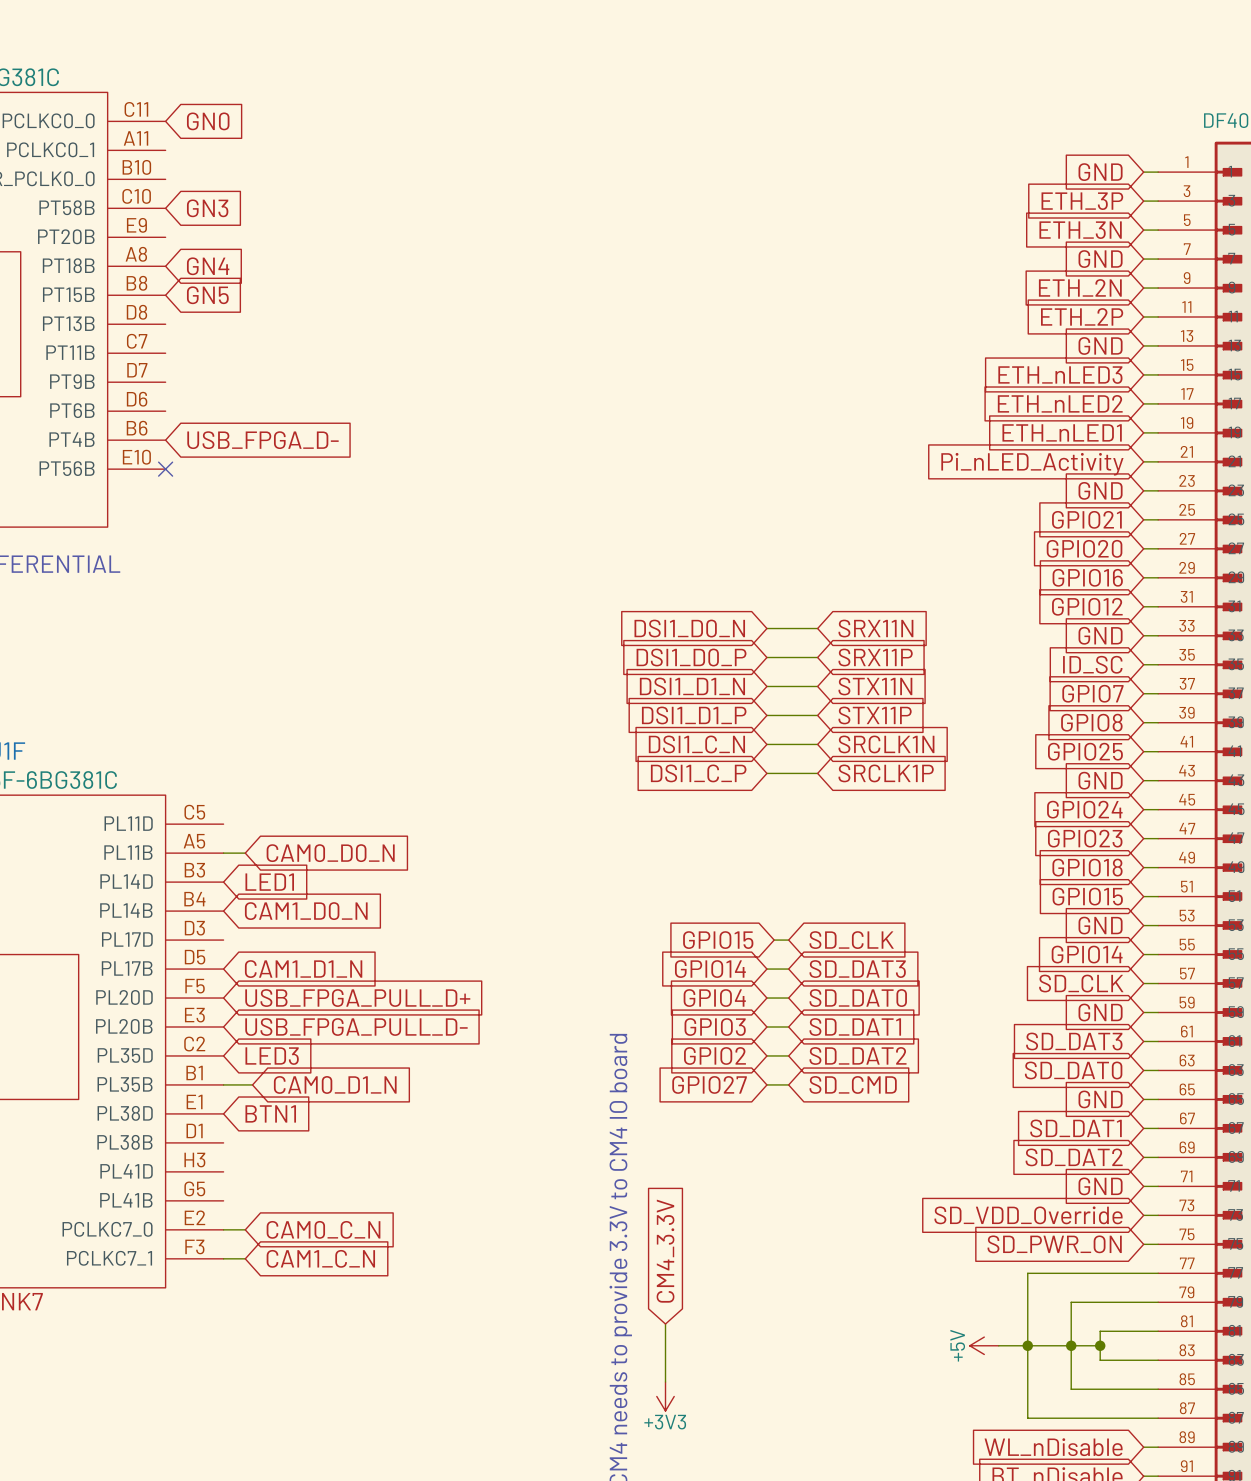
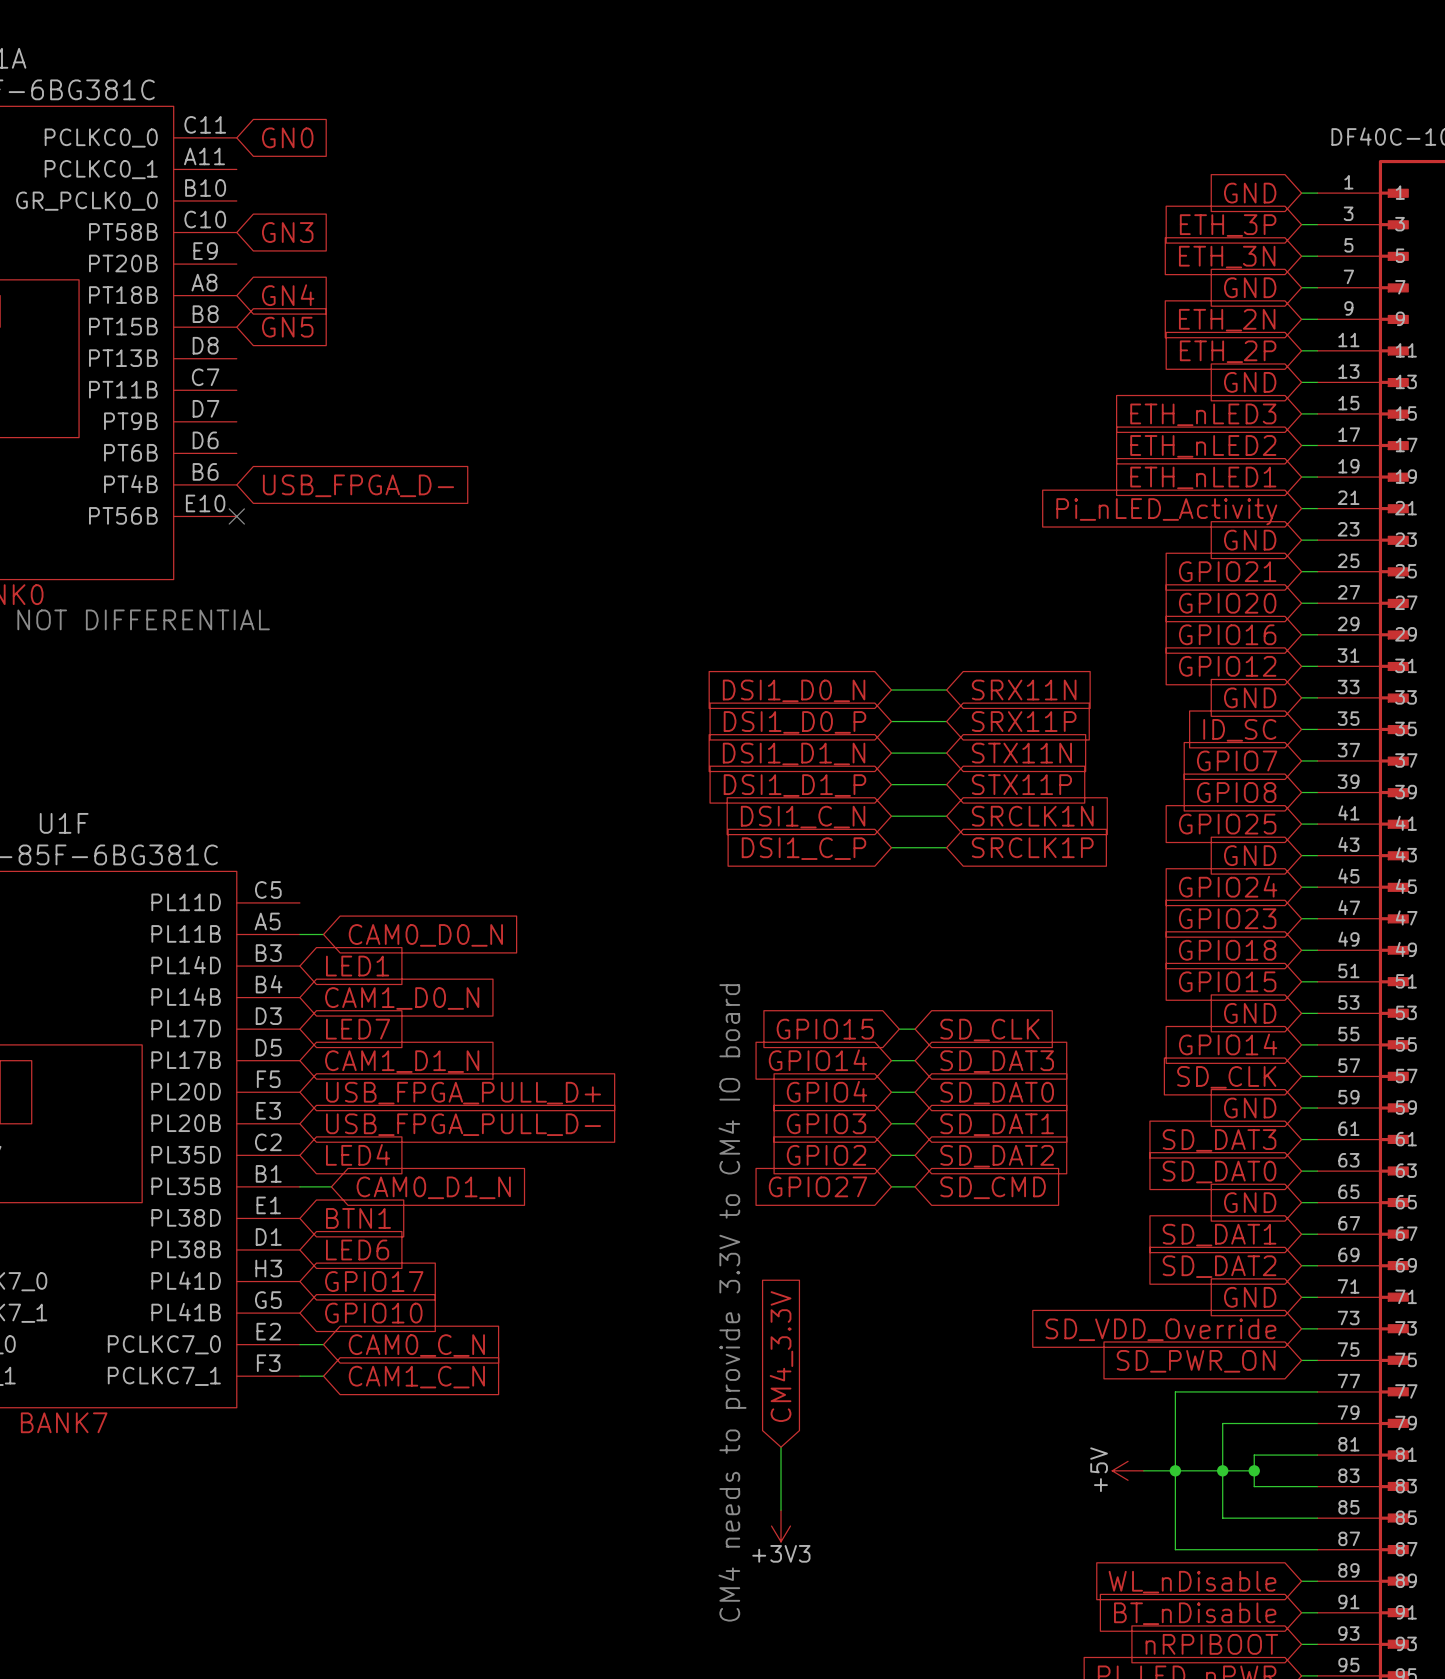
global label: none -> LED7 (358, 1029)
global label: LED3 (272, 1056) -> LED4 (358, 1154)
global label: none -> LED6 (357, 1249)
global label: none -> GPIO17 (374, 1281)
global label: none -> GPIO10 (373, 1313)

